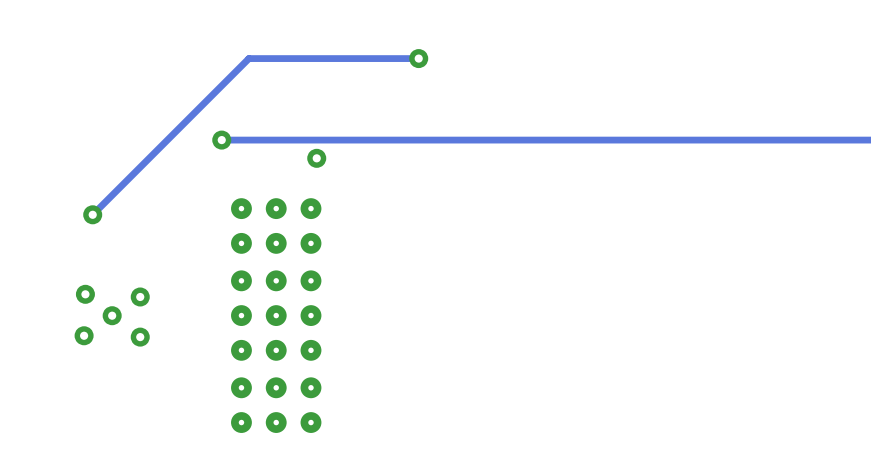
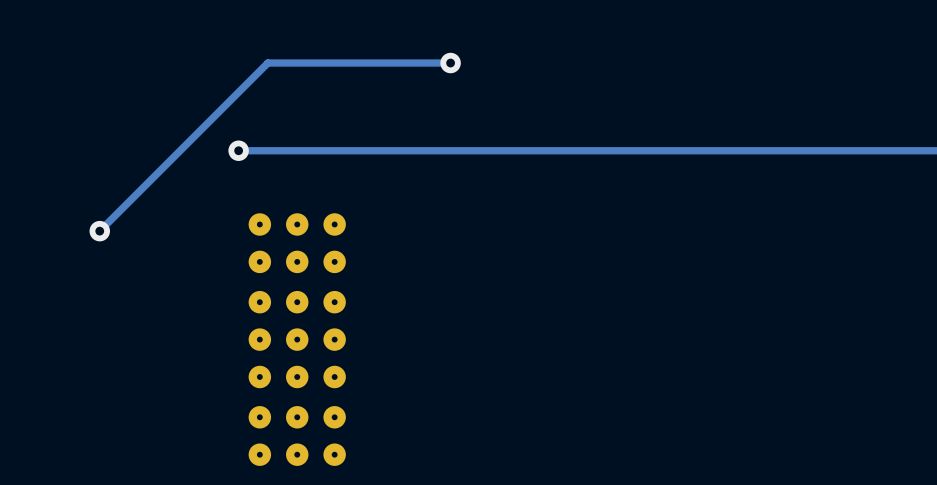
via: (316, 158) -> none
via: (85, 294) -> none
via: (140, 296) -> none
via: (112, 315) -> none
via: (84, 335) -> none
via: (140, 337) -> none

